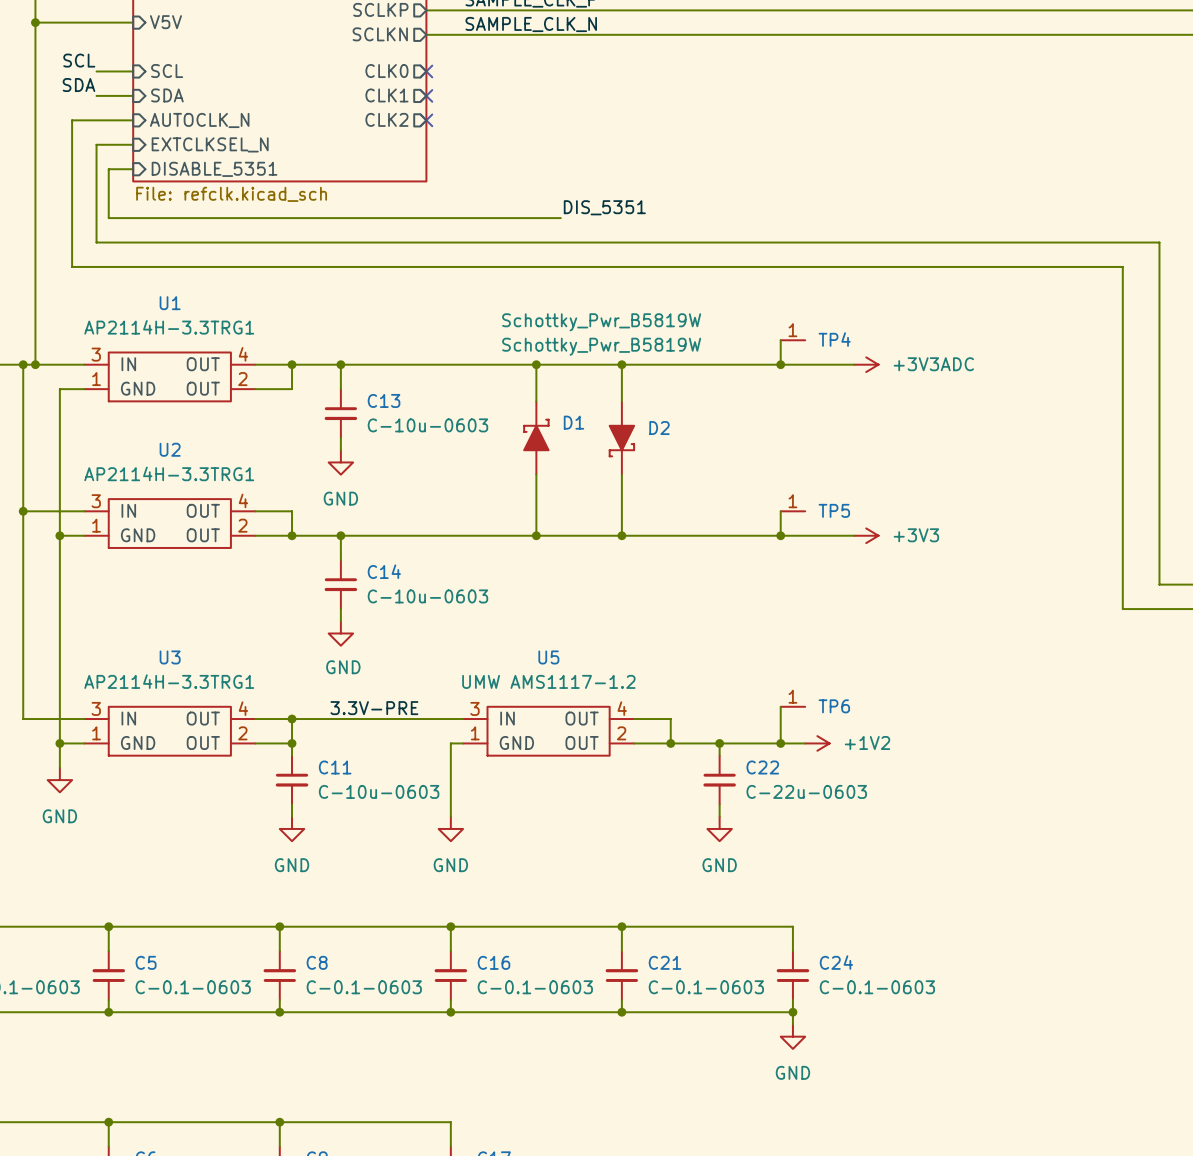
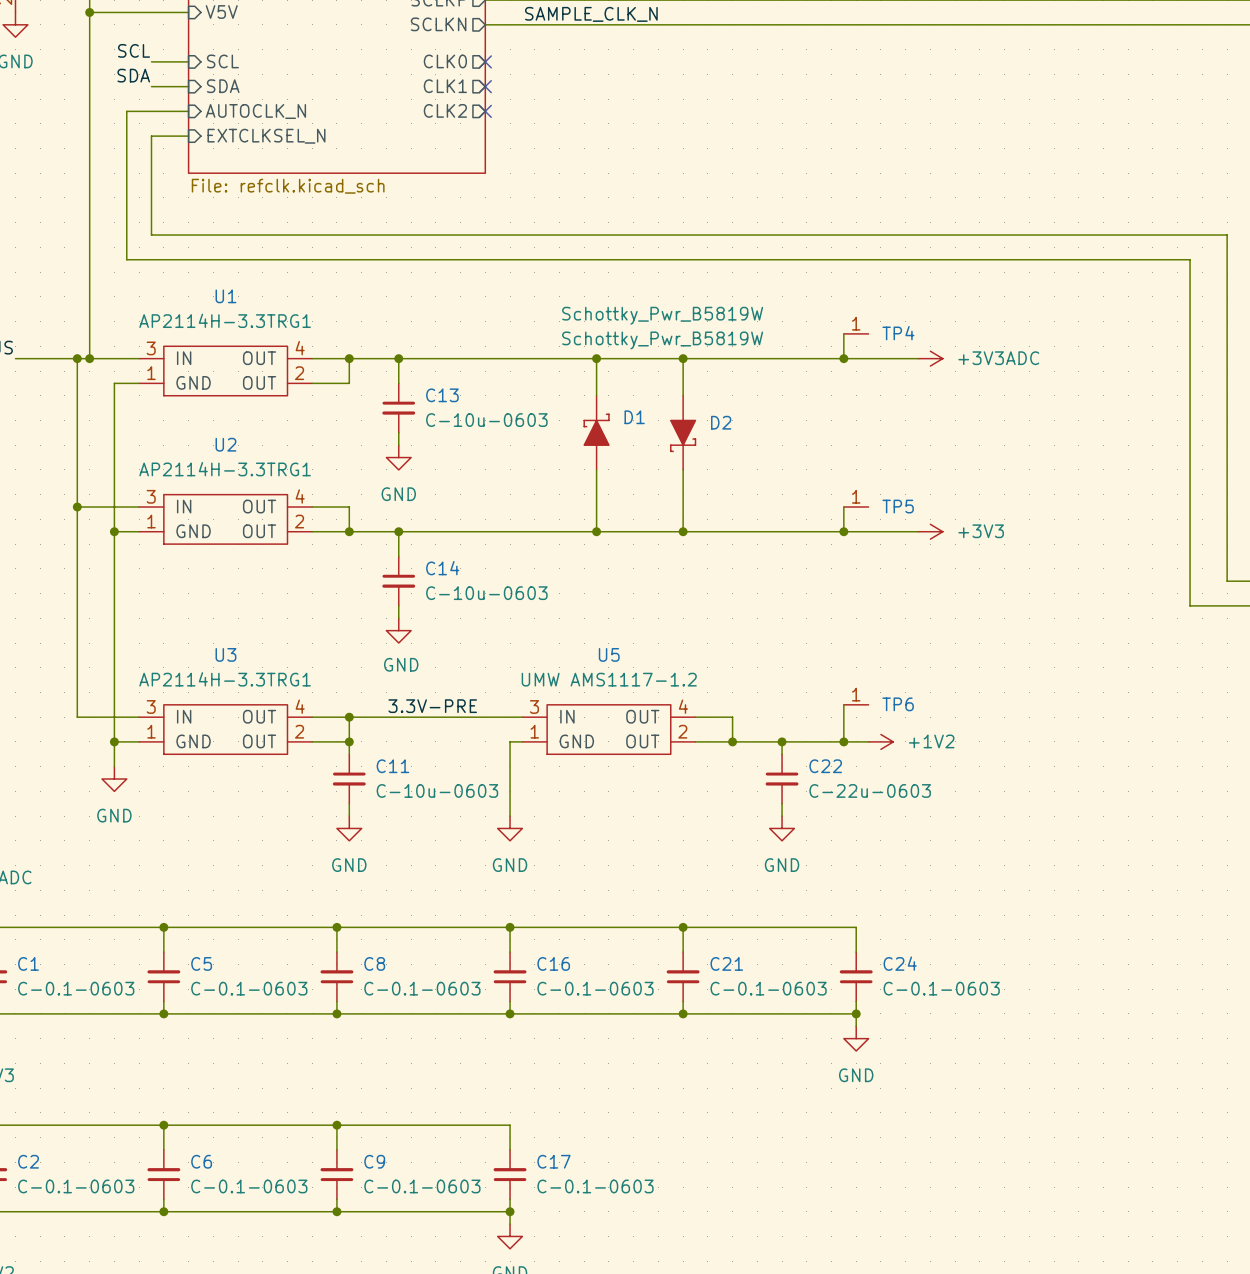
wire: (133, 169) (108, 169) (108, 218) (560, 218) -> none
sheet pin: DISABLE_5351 (214, 169) -> none
label: DIS_5351 (604, 207) -> none

